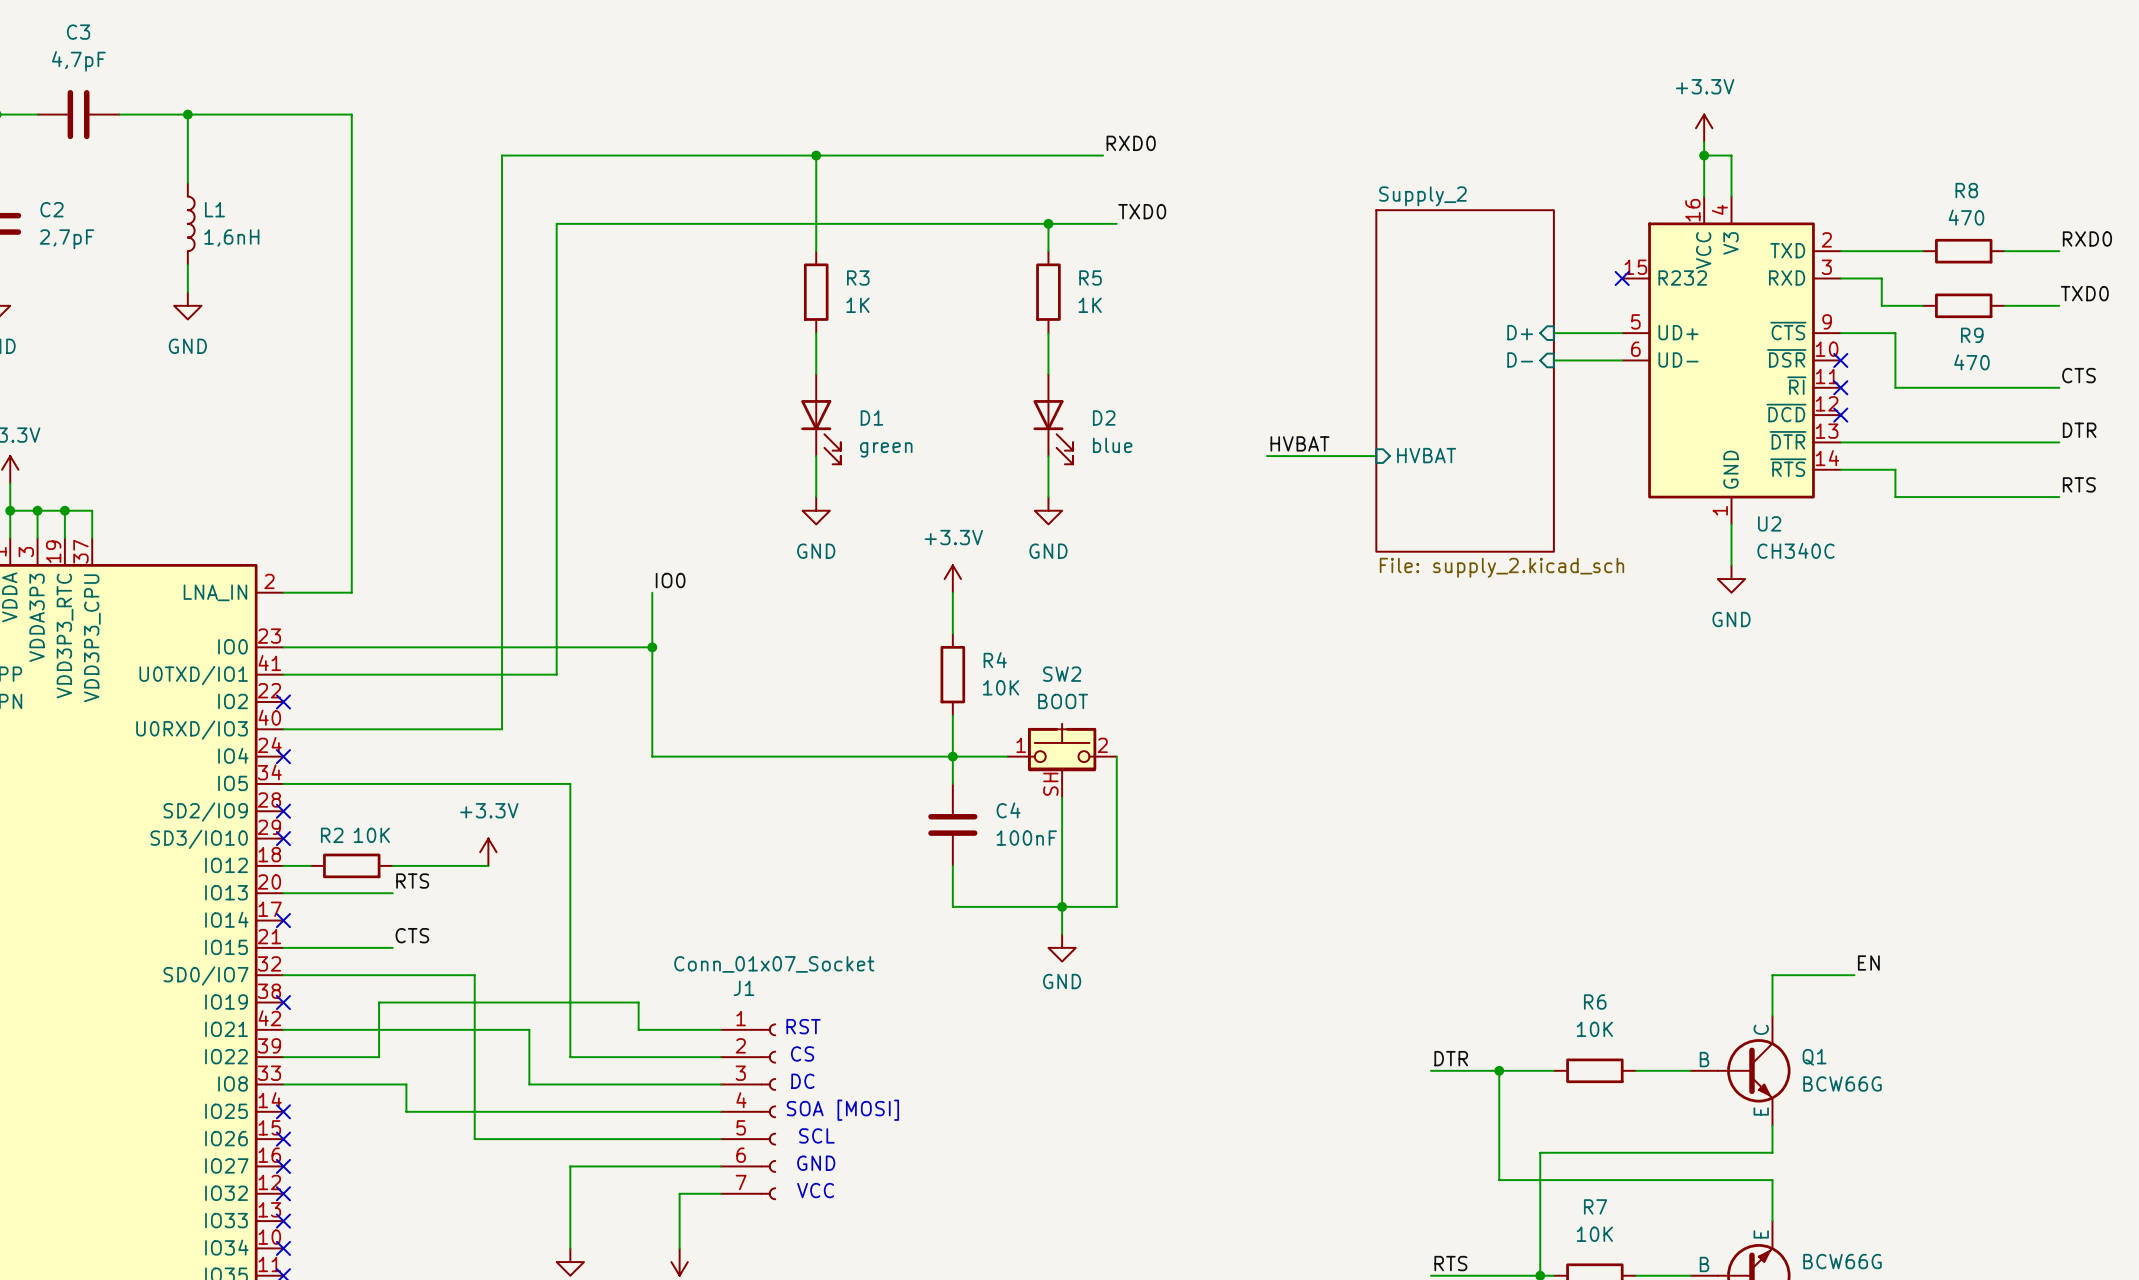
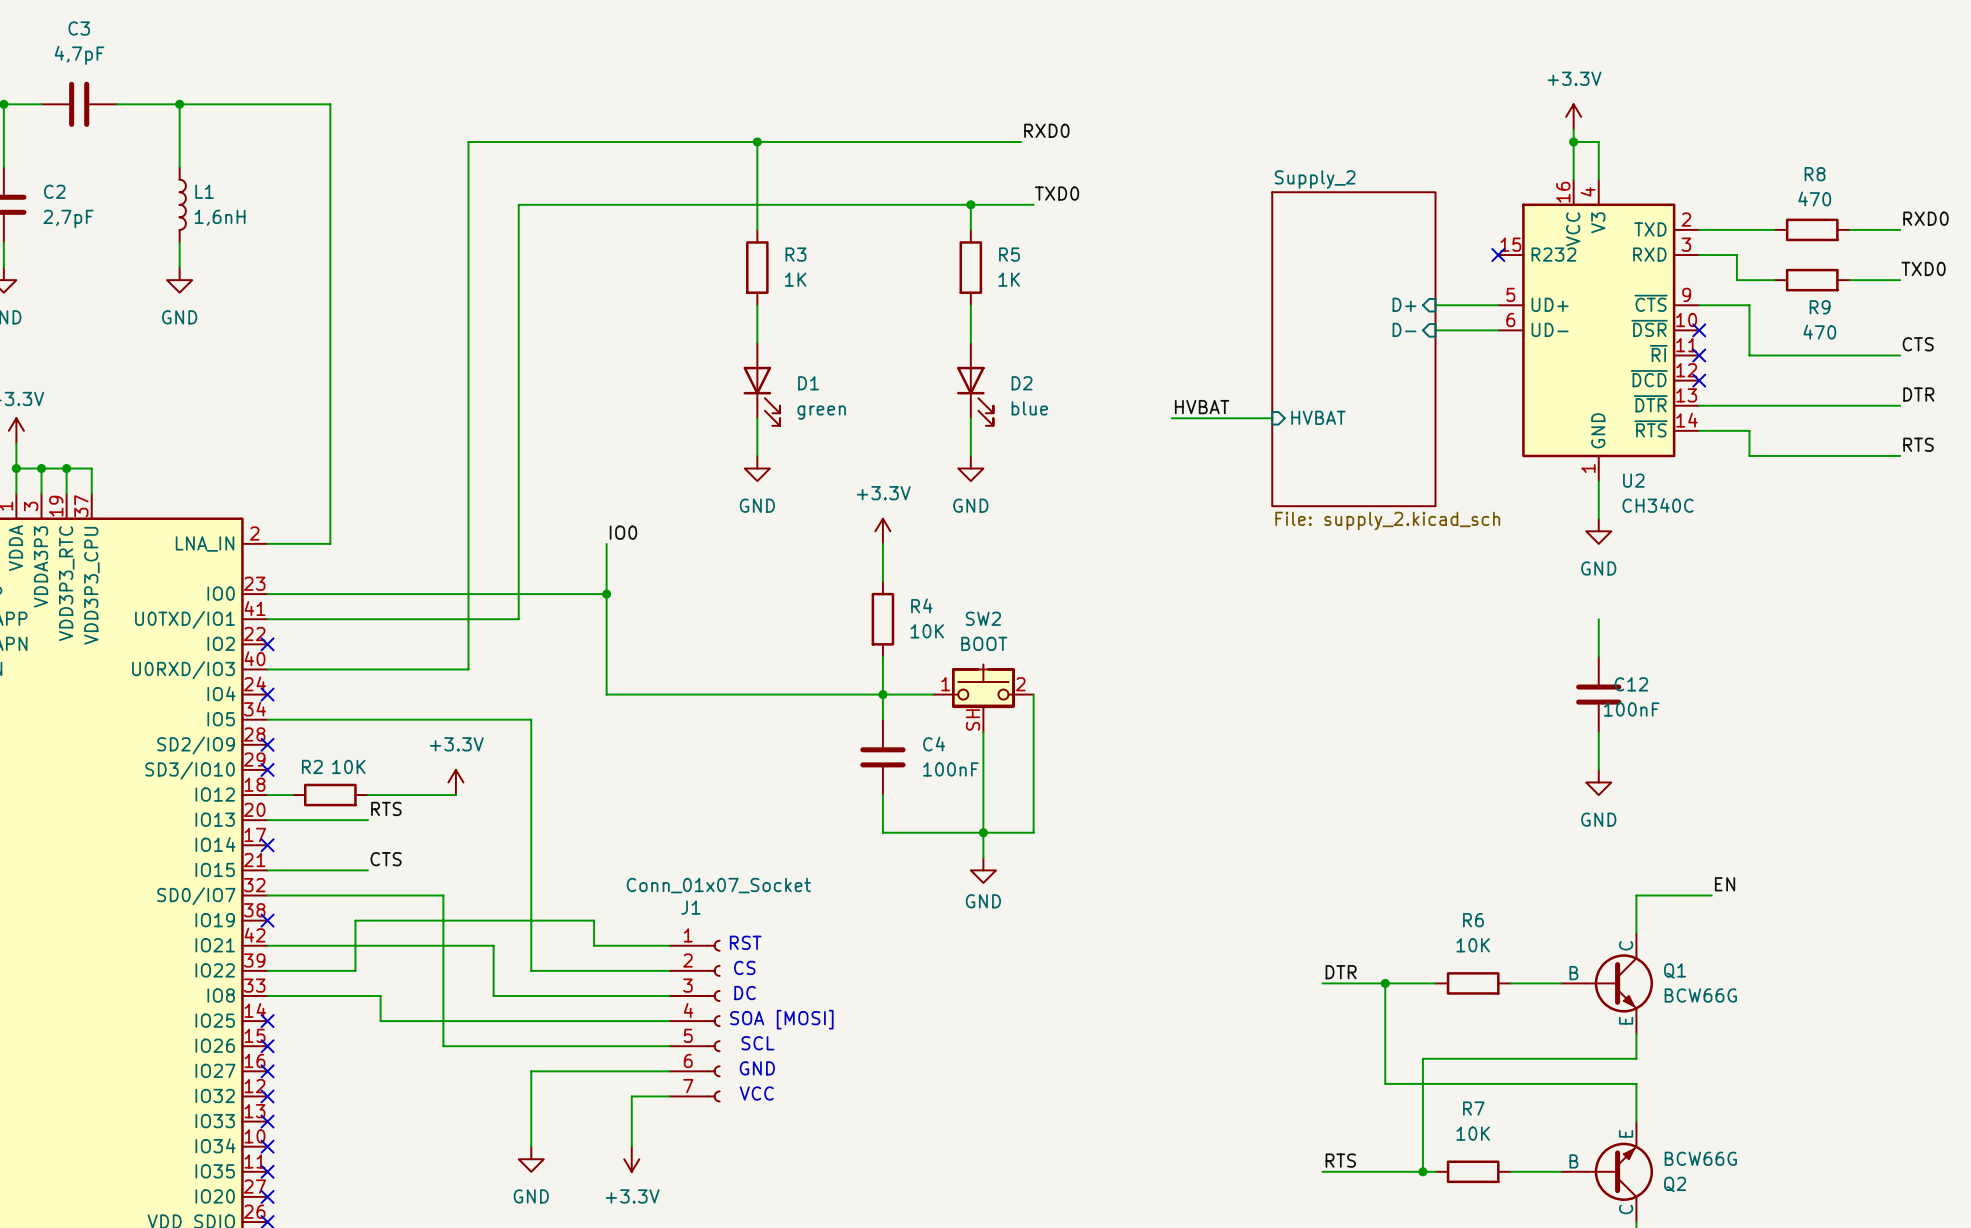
wire: none -> (1598, 619) (1598, 656)
C12: none -> 100nF (1598, 694)
wire: none -> (1598, 732) (1598, 769)
power symbol: none -> GND (1598, 782)

